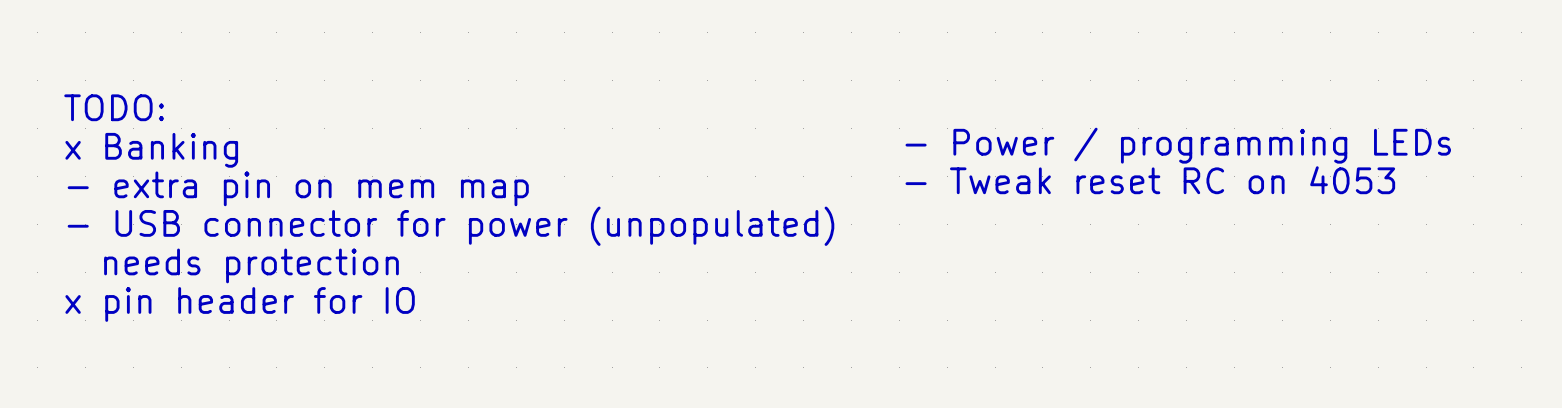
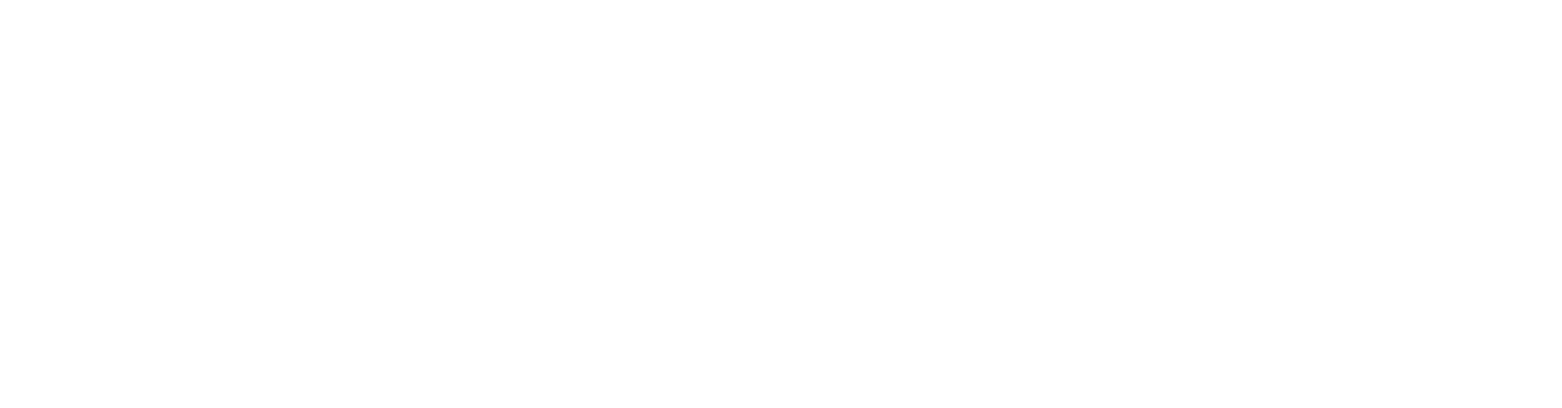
text: TODO: (114, 107) -> none
text: - Power / programming LEDs (1178, 145) -> none
text: x Banking (151, 150) -> none
text: - Tweak reset RC on 4053 (1150, 180) -> none
text: - extra pin on mem map (298, 188) -> none
text: - USB connector for power (unpopulated) (450, 226) -> none
text: needs protection (251, 265) -> none
text: x pin header for IO (240, 304) -> none

